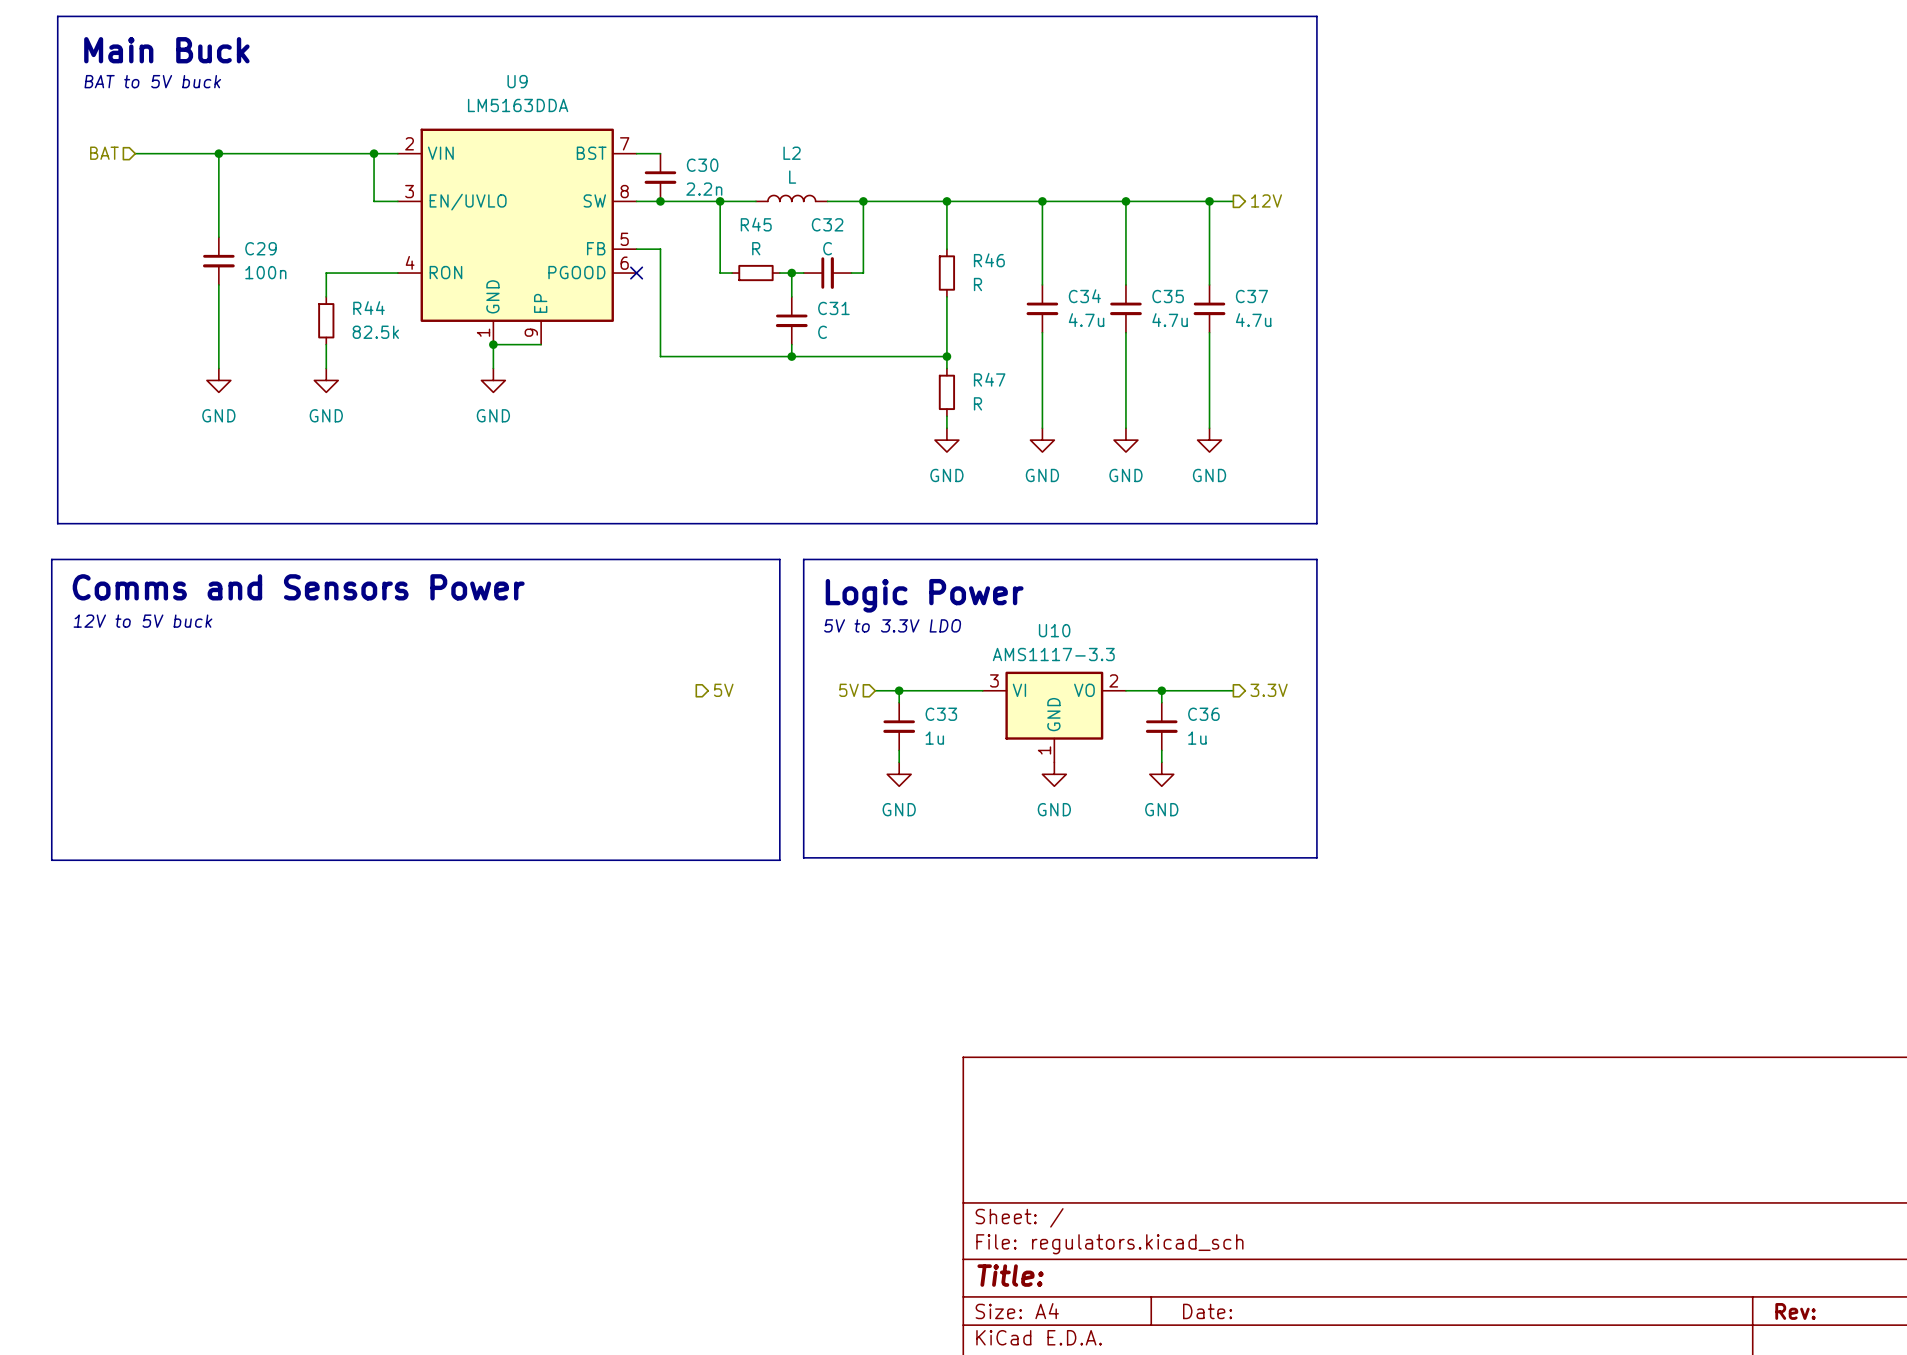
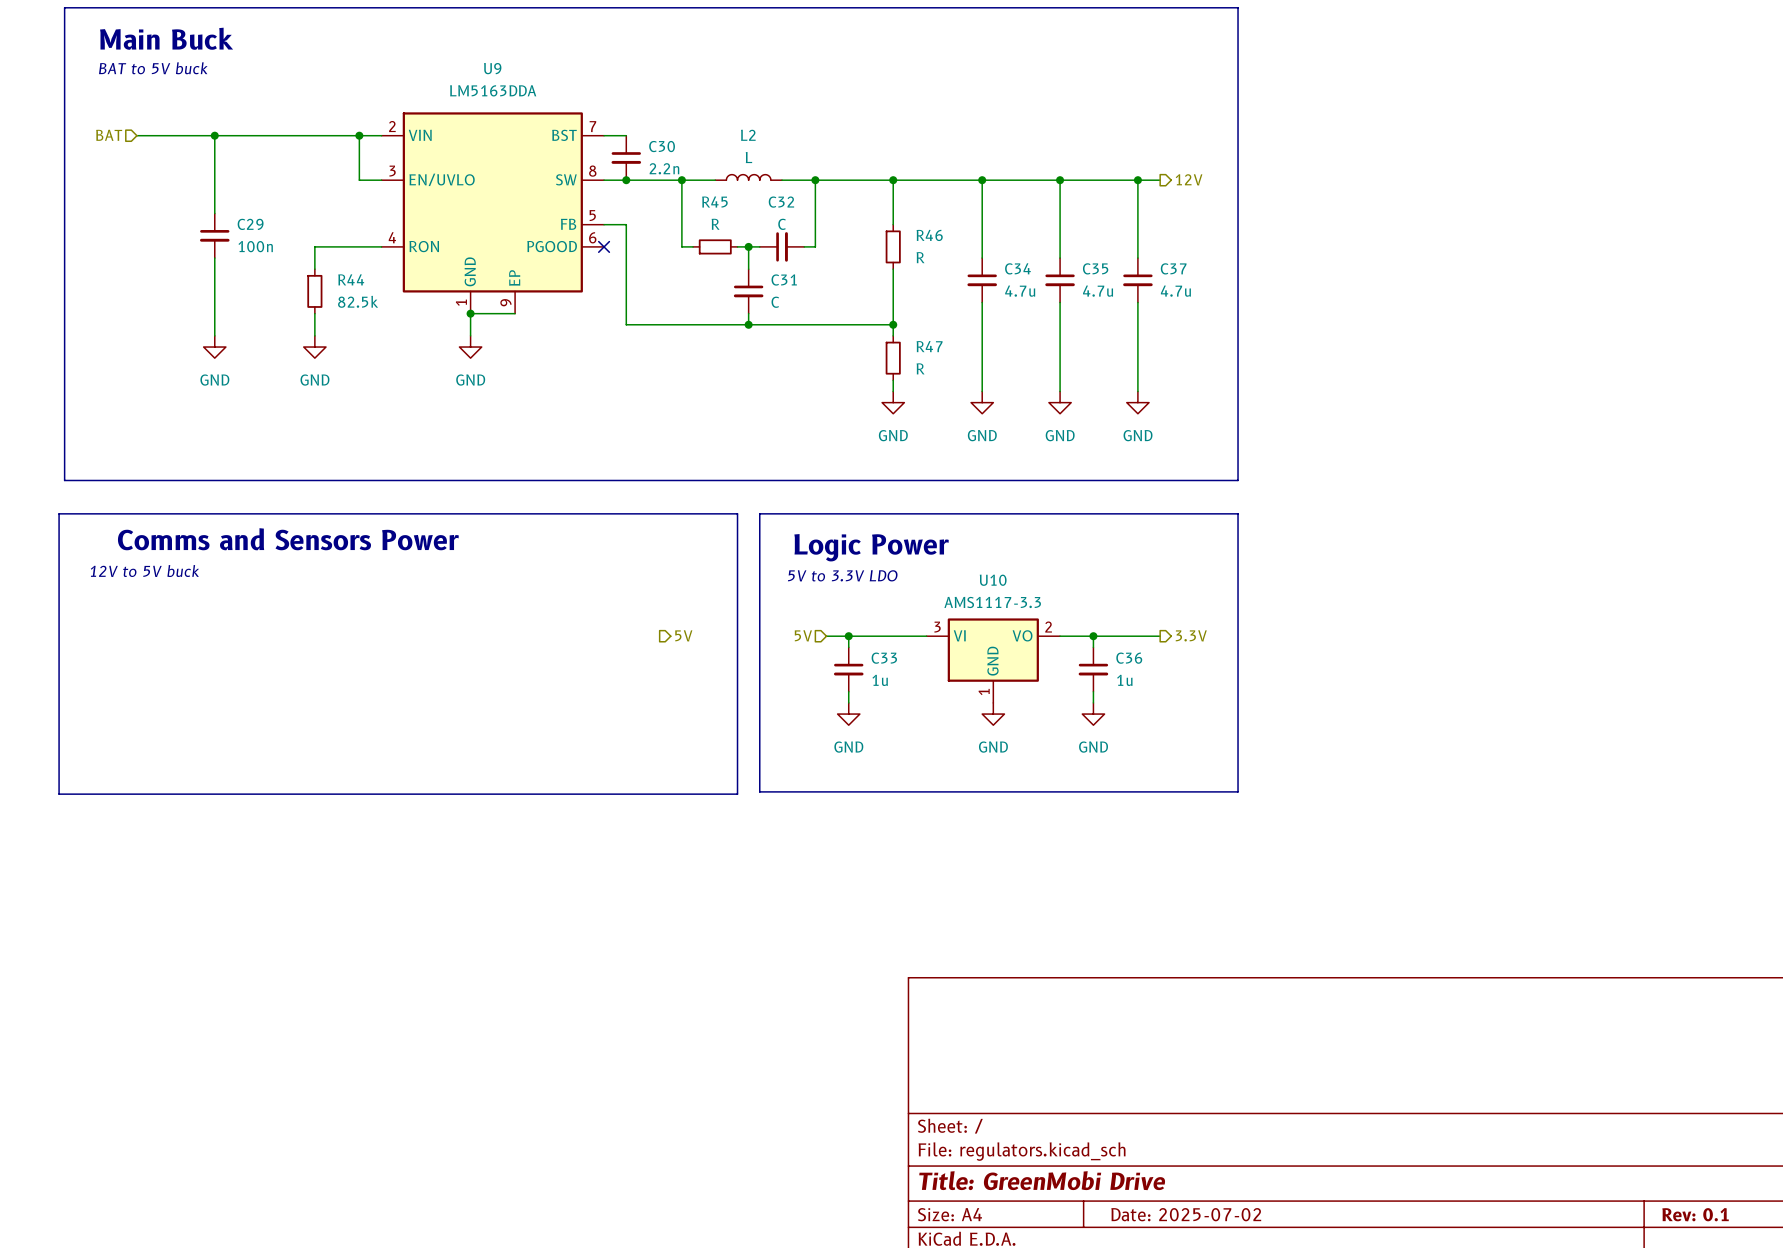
title block: Title: (1010, 1275) -> Title: GreenMobi Drive (1042, 1180)
title block: Date: (1207, 1311) -> Date: 2025-07-02 (1186, 1214)
title block: Rev: (1795, 1311) -> Rev: 0.1 (1695, 1214)

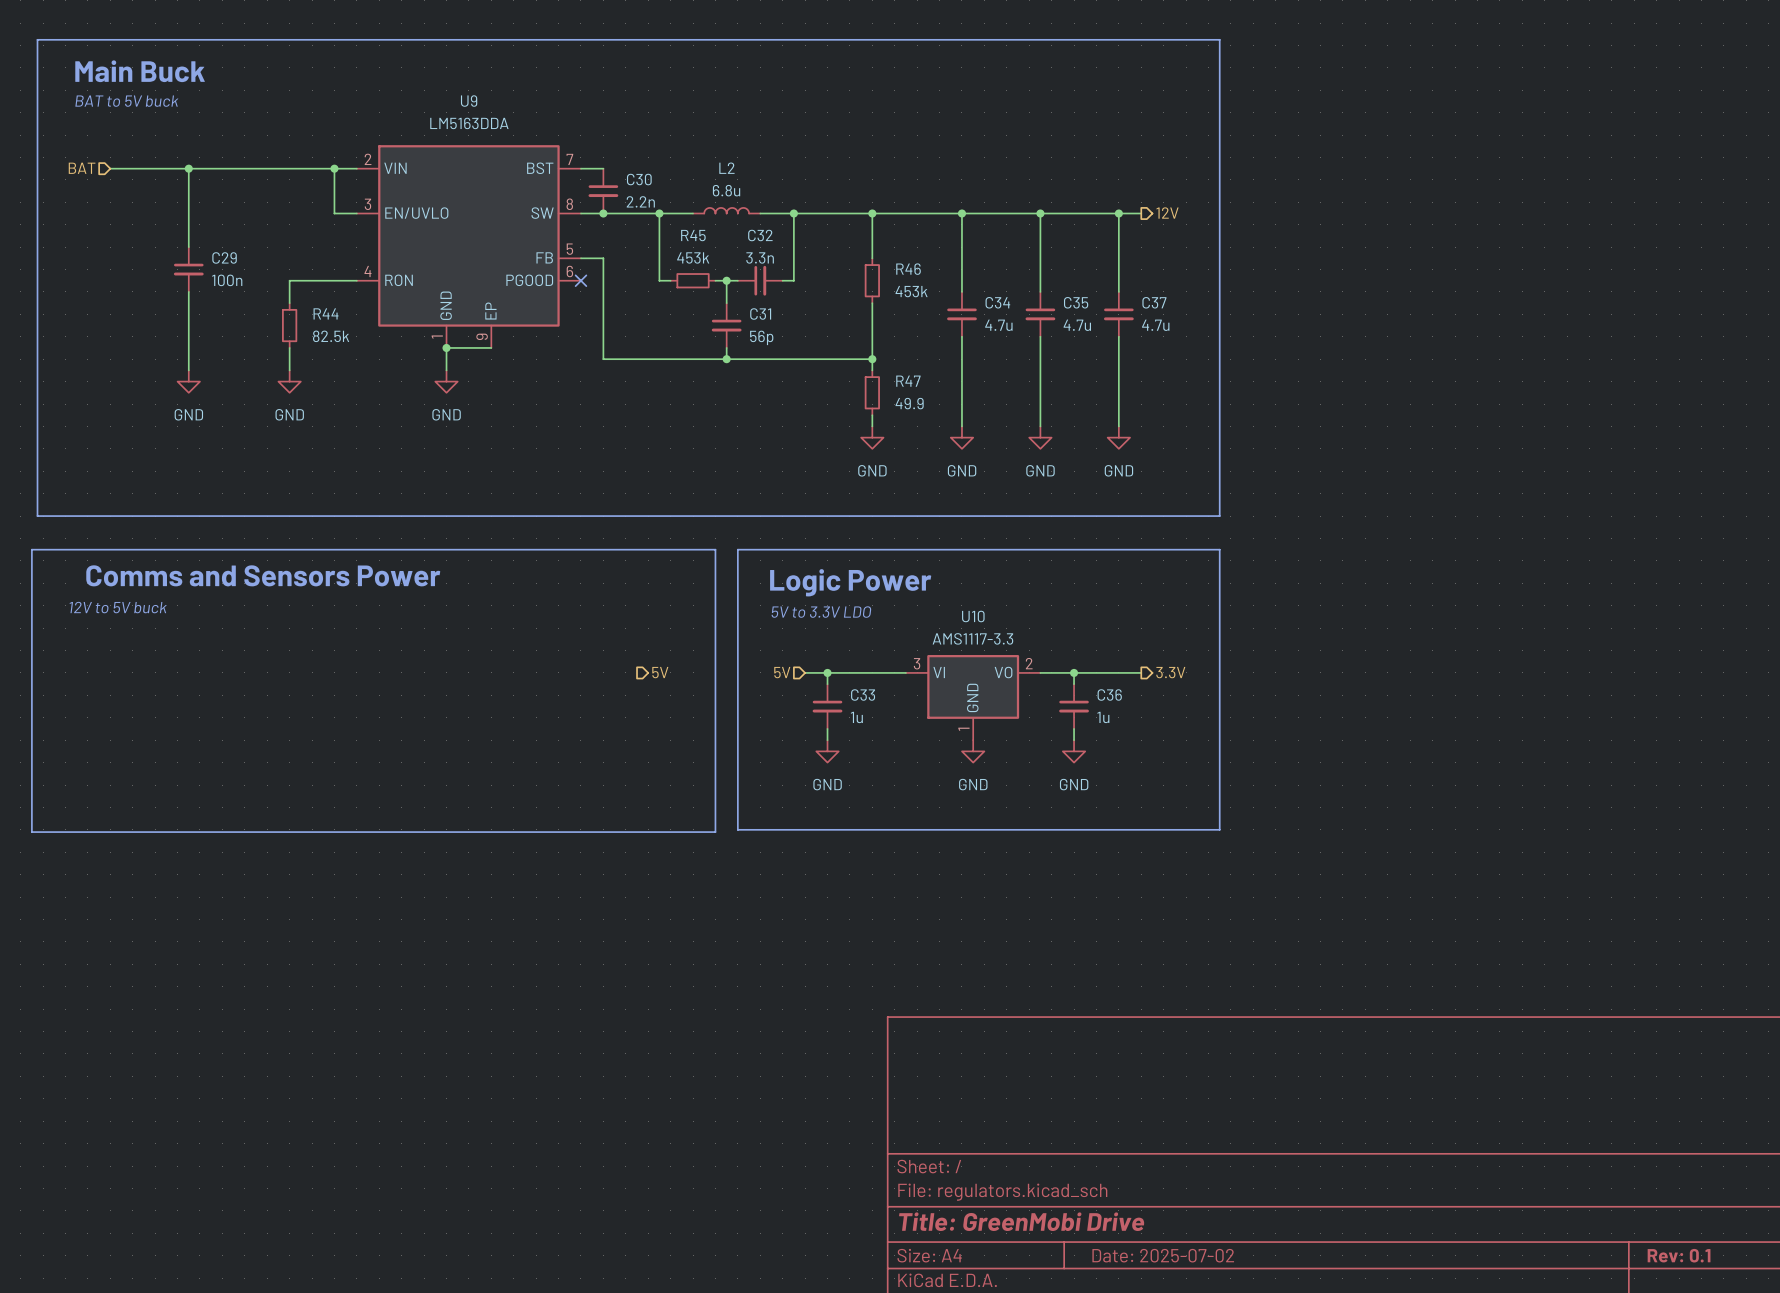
L2 value: L (749, 157) -> 6.8u (726, 190)
R45 value: R (715, 224) -> 453k (693, 257)
C32 value: C (782, 224) -> 3.3n (760, 257)
R46 value: R (920, 257) -> 453k (911, 291)
C31 value: C (775, 302) -> 56p (761, 337)
R47 value: R (920, 368) -> 49.9 (909, 403)

